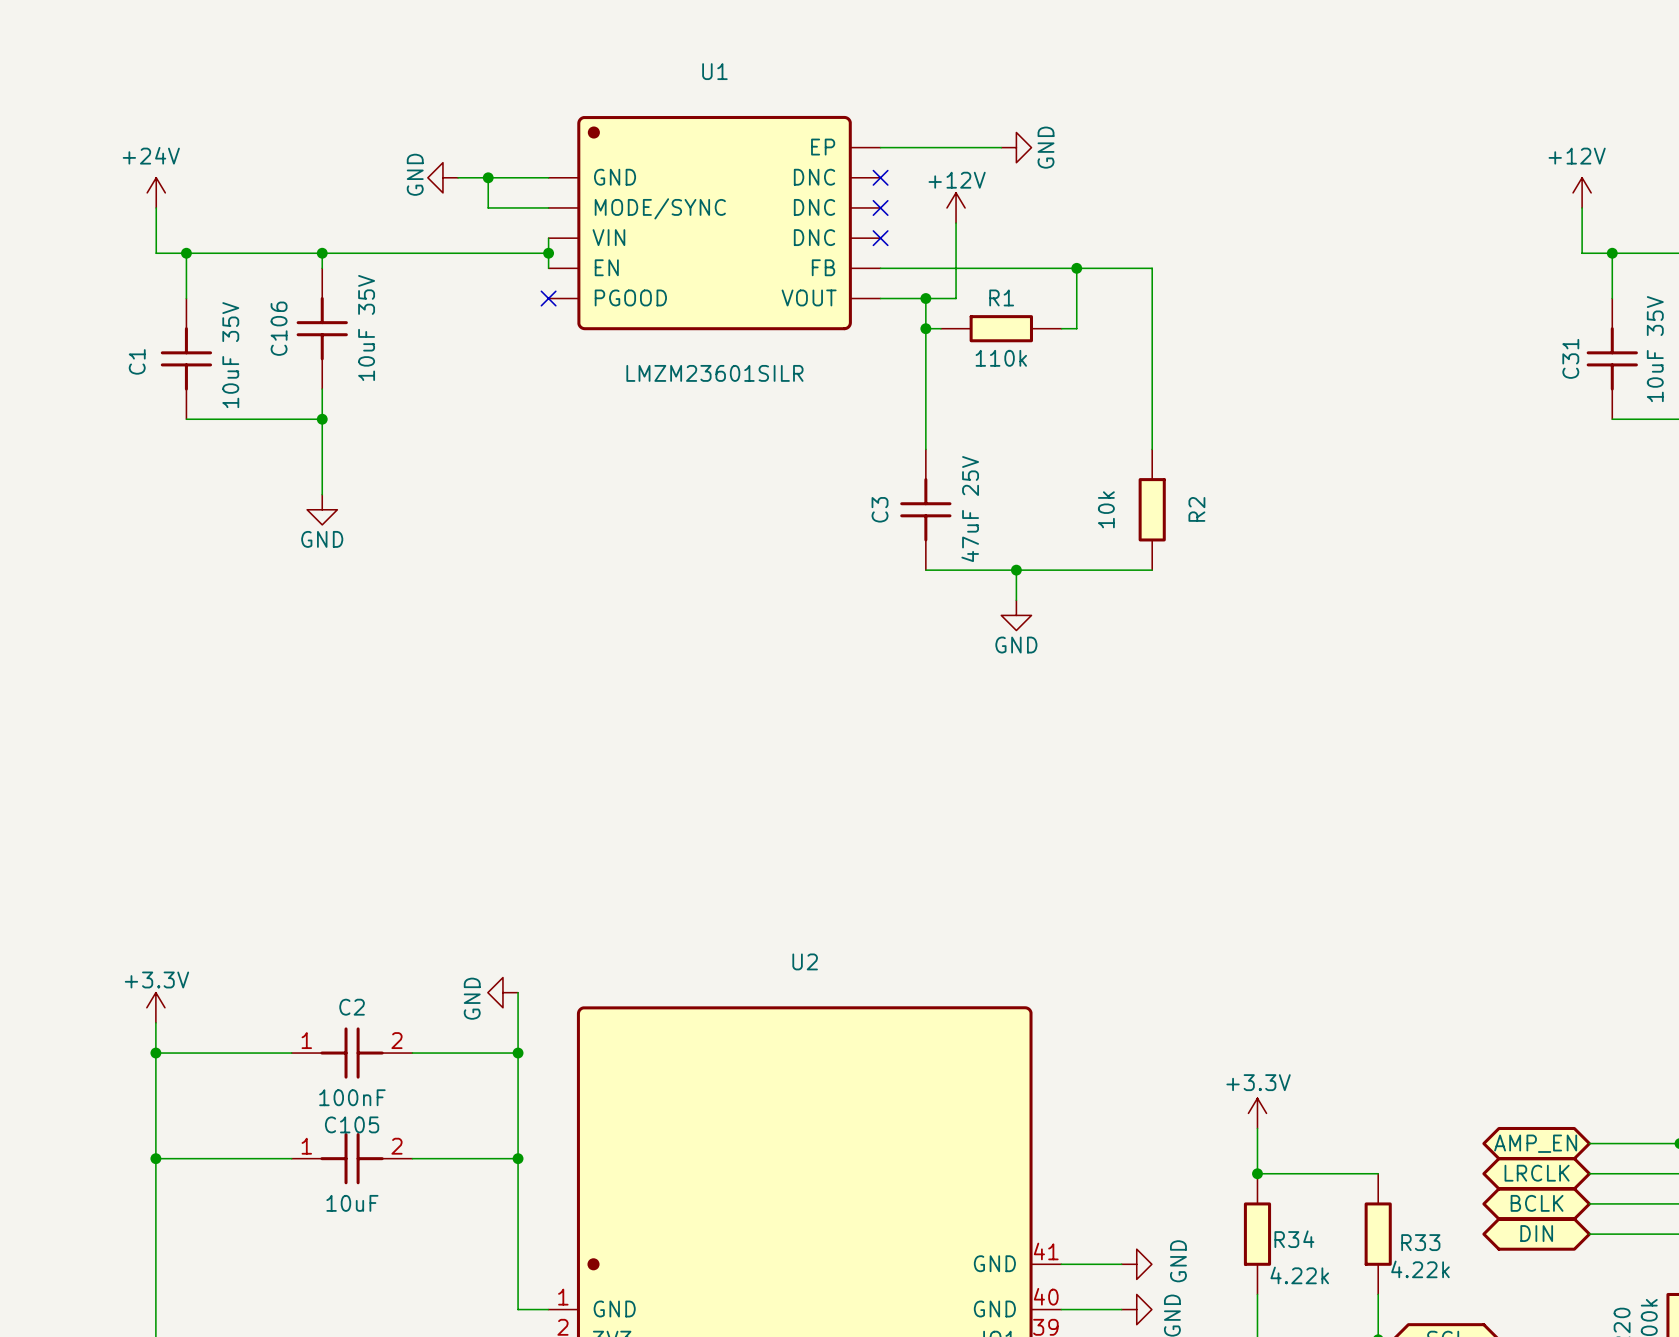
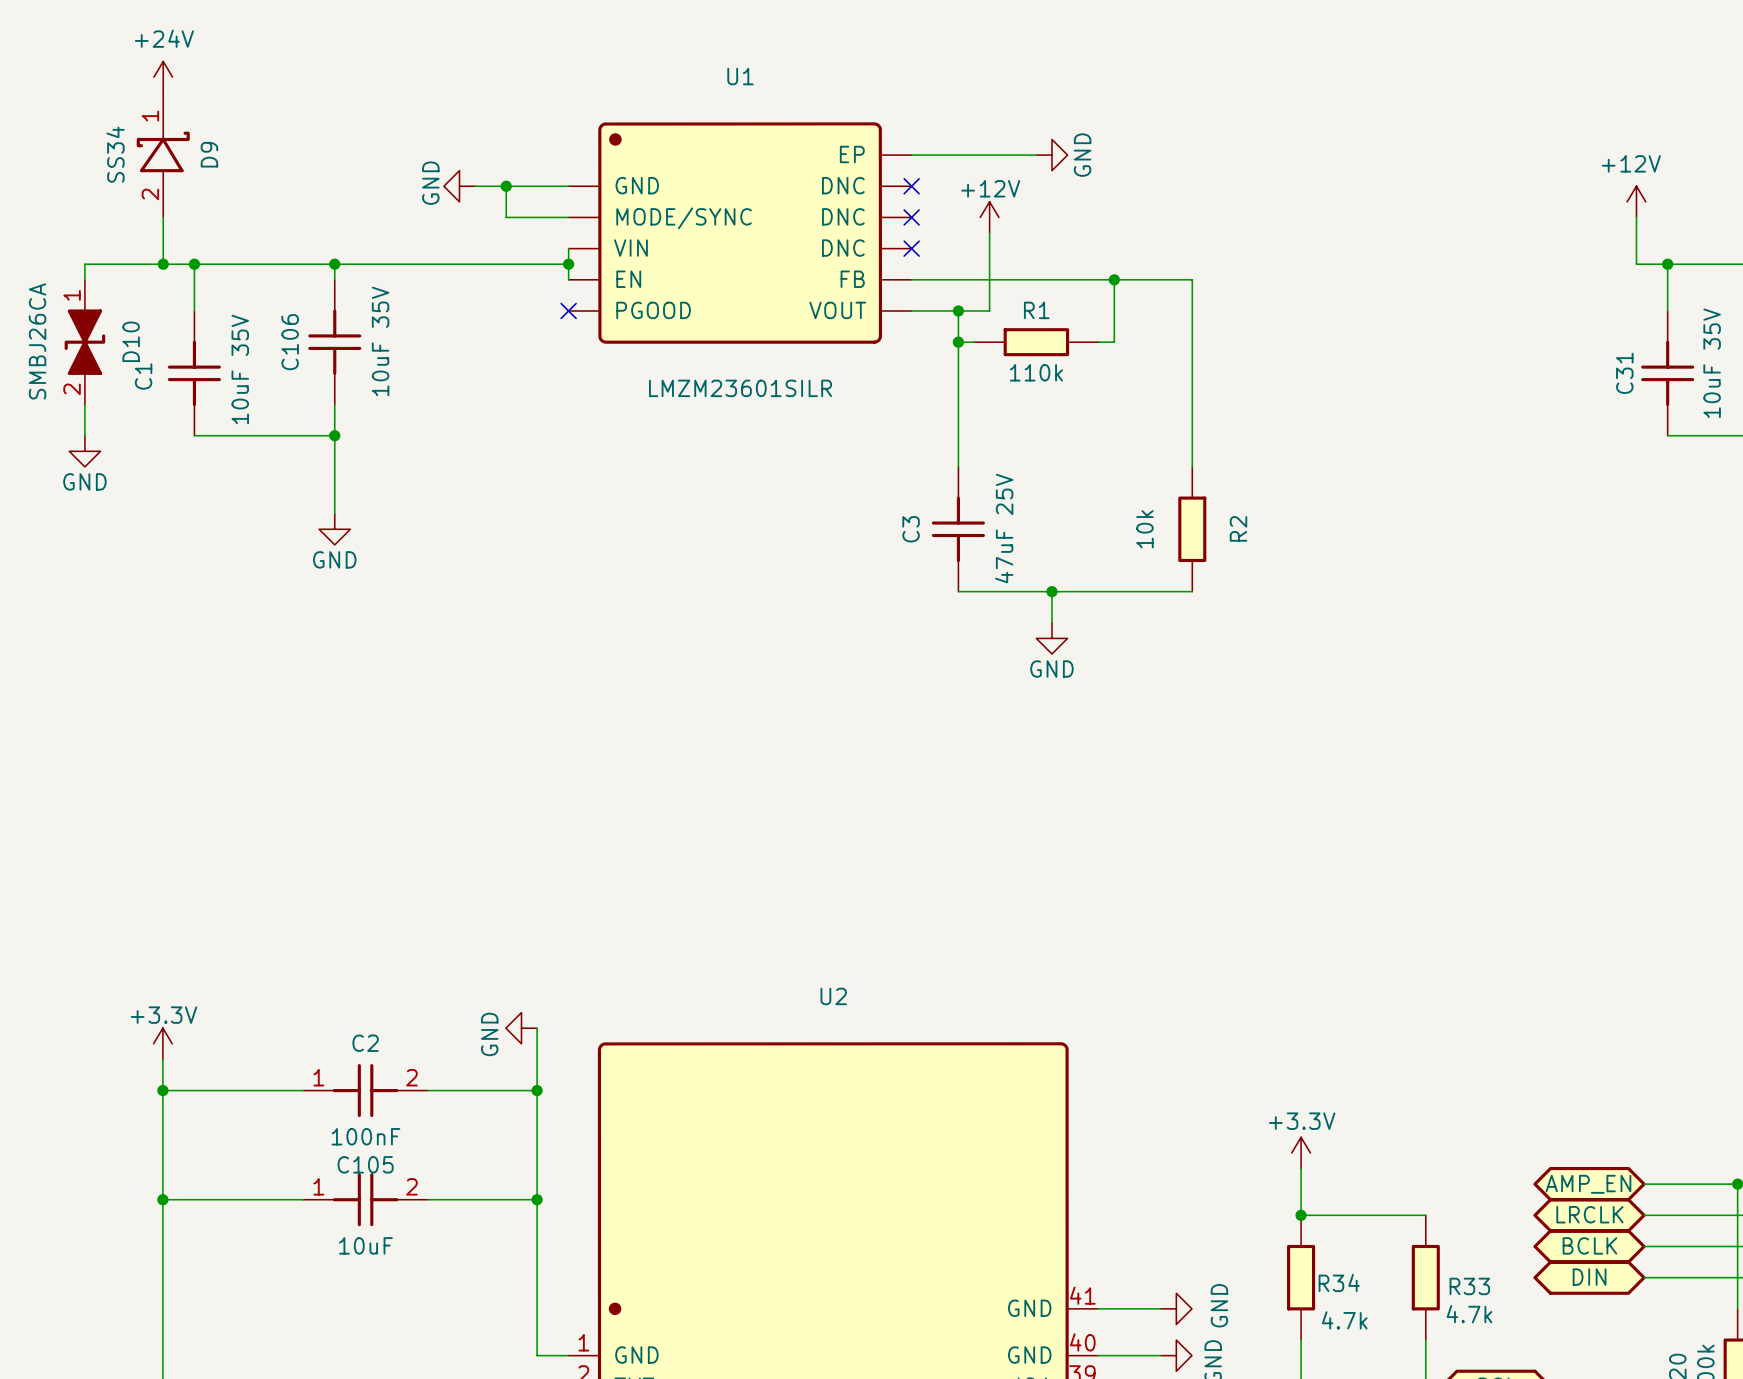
D9: none -> SS34 (163, 155)
power symbol text position: +24V (151, 155) -> +24V (164, 38)
power symbol position: +24V (156, 192) -> +24V (163, 77)
wire: none -> (163, 264) (84, 264) (84, 279)
junction: none -> (163, 264)
D10: none -> SMBJ26CA (84, 342)
wire: none -> (84, 404) (84, 435)
power symbol: none -> GND (84, 451)
R33 value: 4.22k (1420, 1269) -> 4.7k (1469, 1314)
R34 value: 4.22k (1299, 1275) -> 4.7k (1344, 1320)

